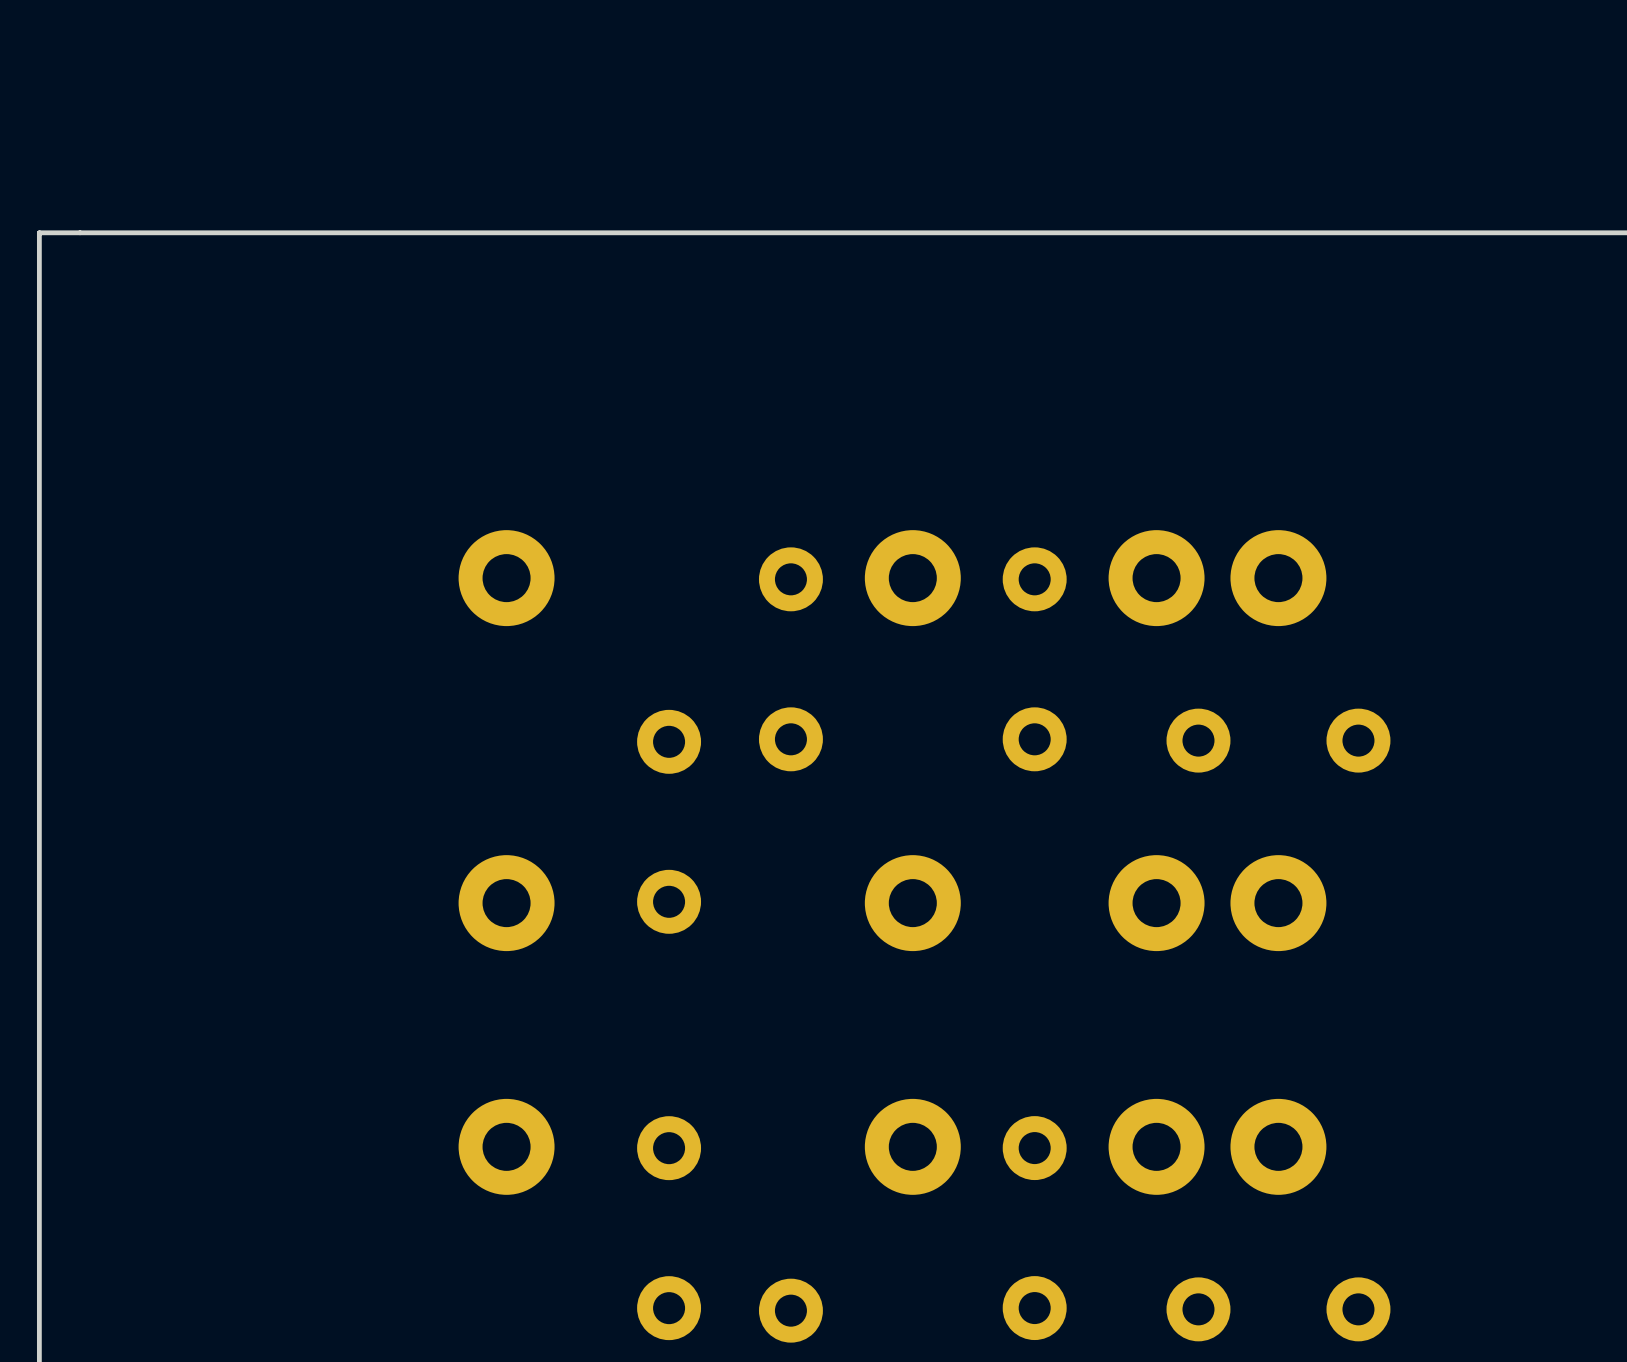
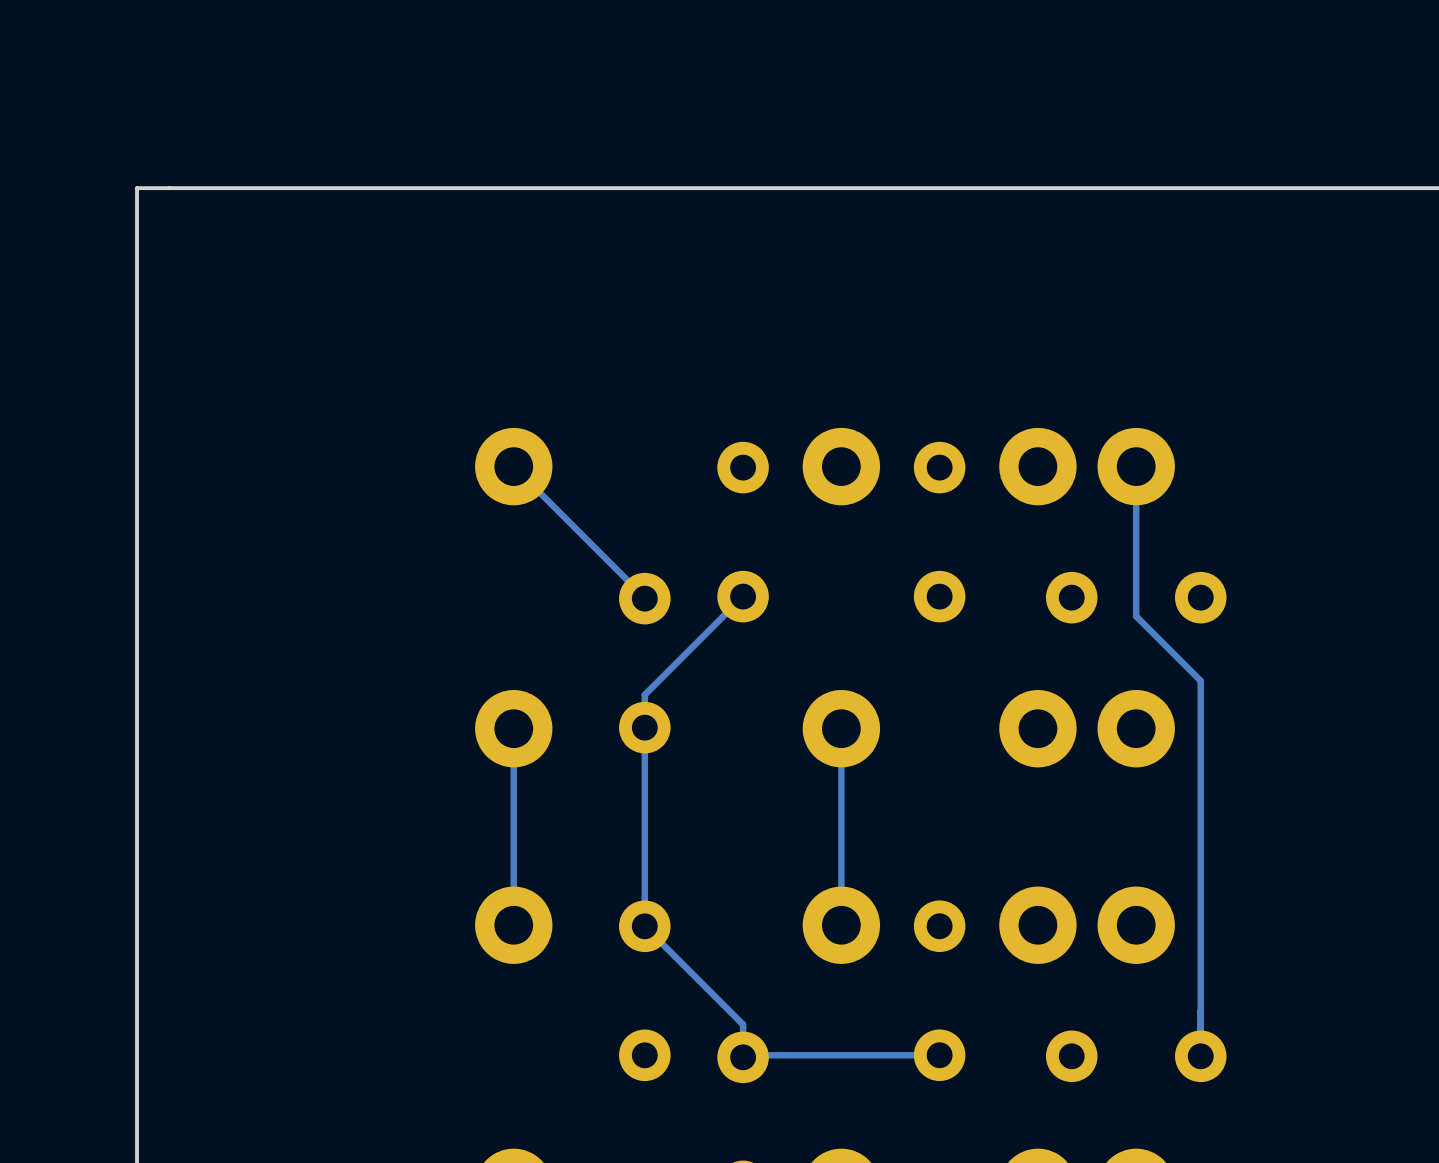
track: none -> (513, 466) (644, 598)
track: none -> (1136, 466) (1136, 616) (1200, 680) (1200, 1056)
track: none -> (743, 596) (644, 694) (644, 926) (743, 1024) (743, 1057)
track: none -> (513, 728) (513, 925)
track: none -> (841, 728) (841, 925)
track: none -> (939, 1055) (743, 1055)

